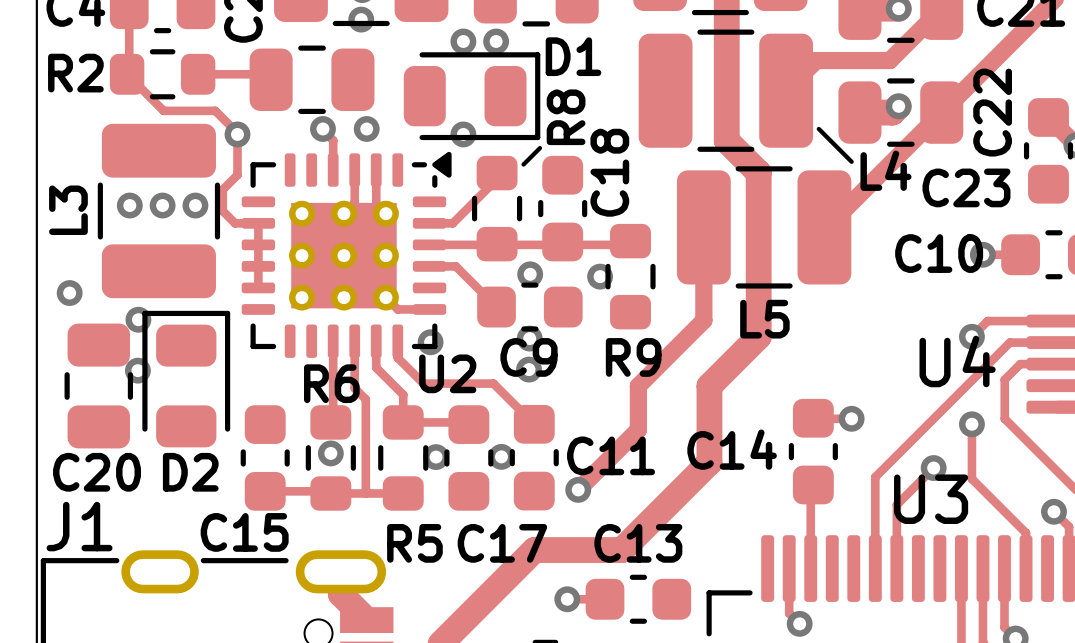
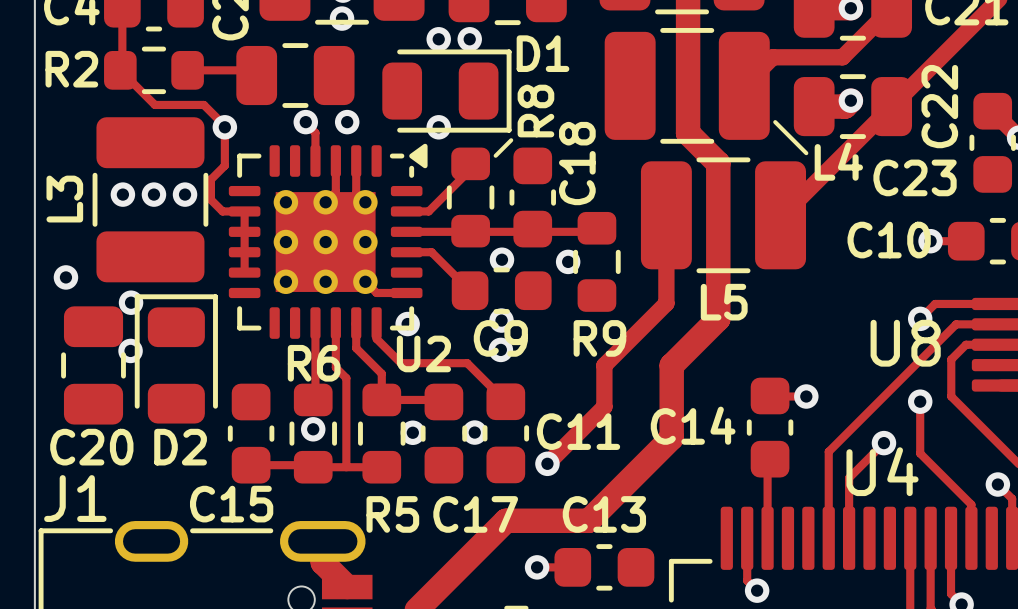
U4 name: U4 (957, 361) -> U8 (905, 343)
U3 name: U3 (931, 499) -> U4 (882, 471)

